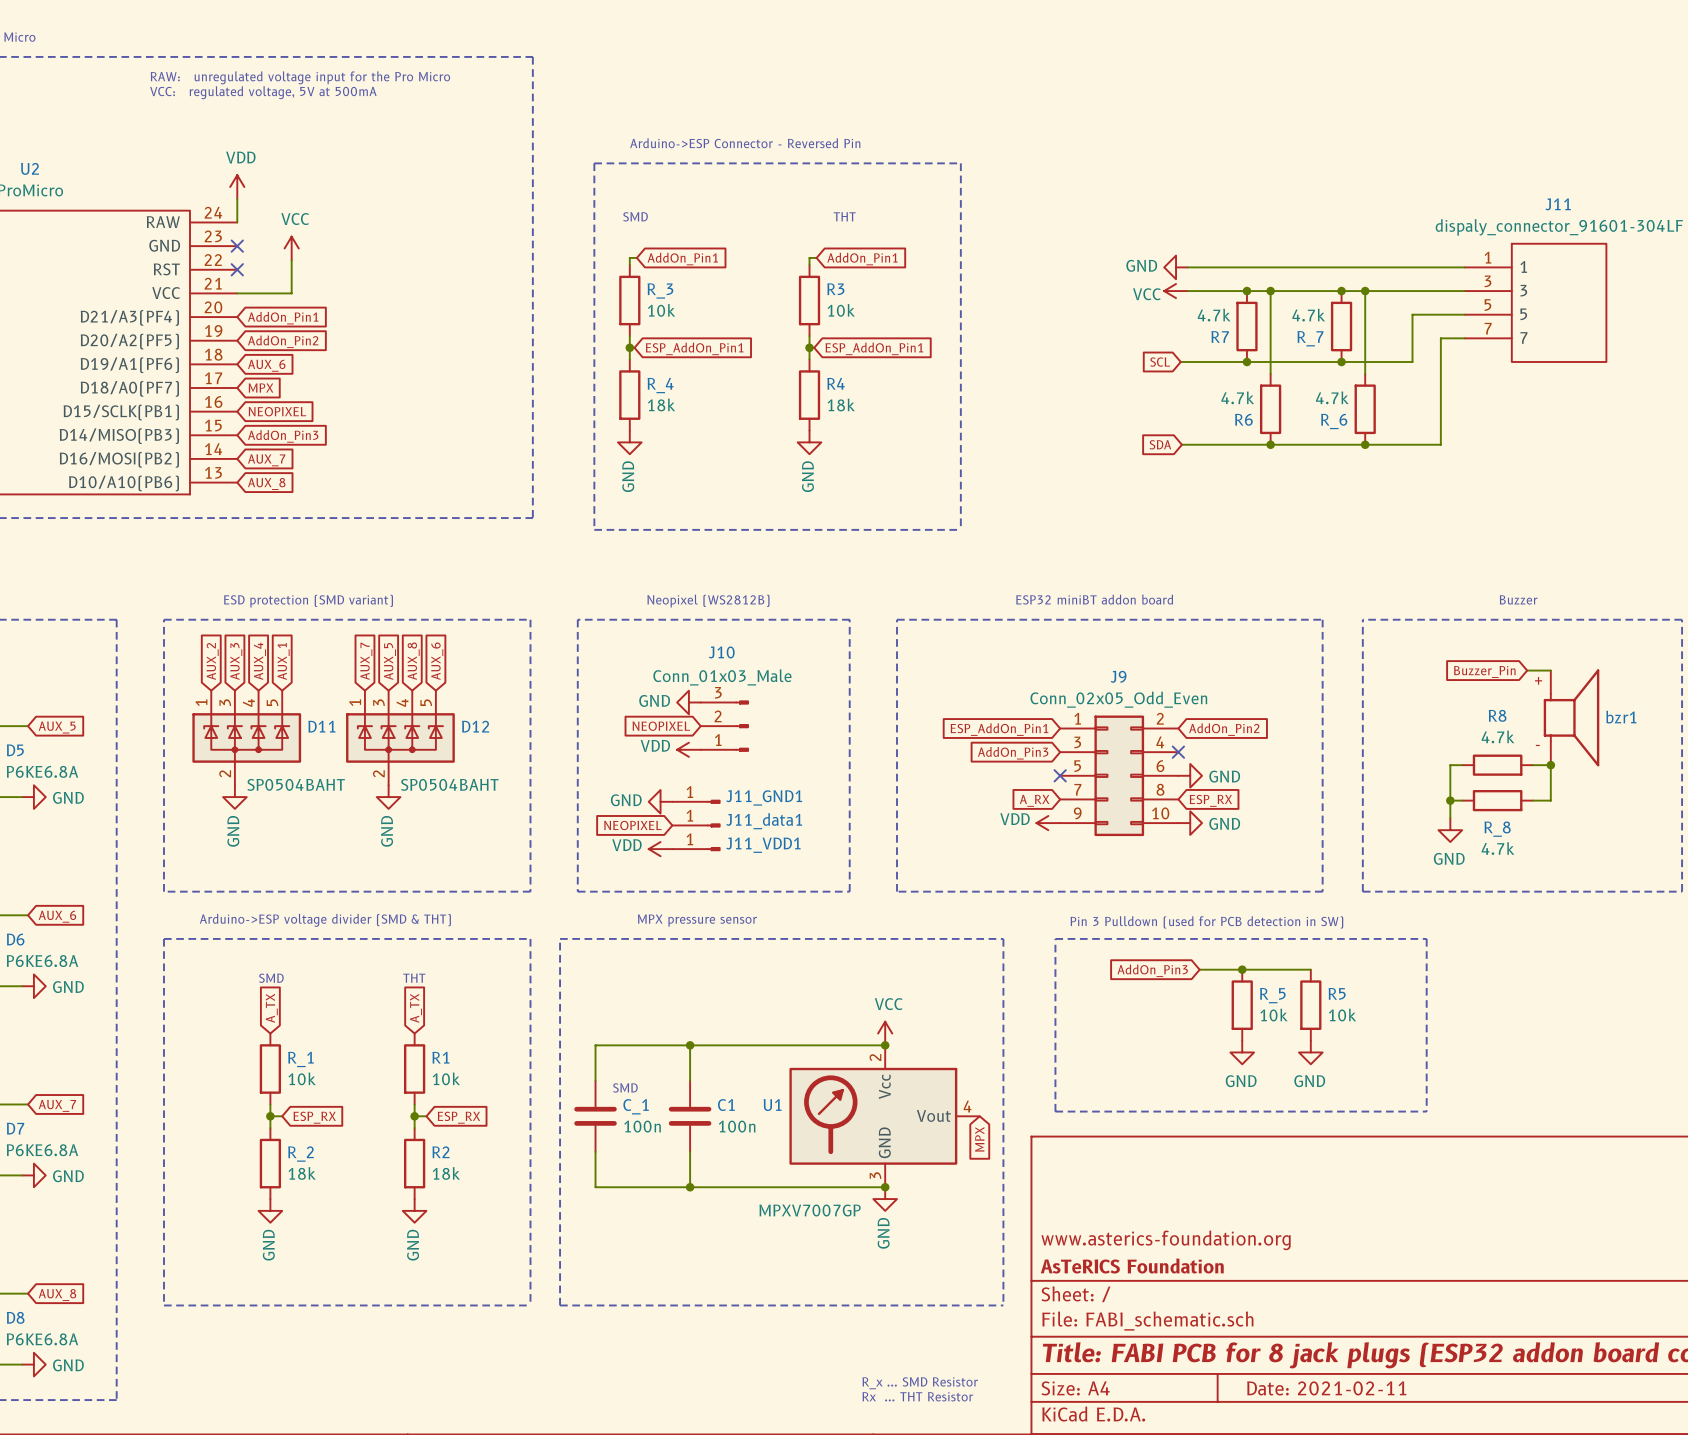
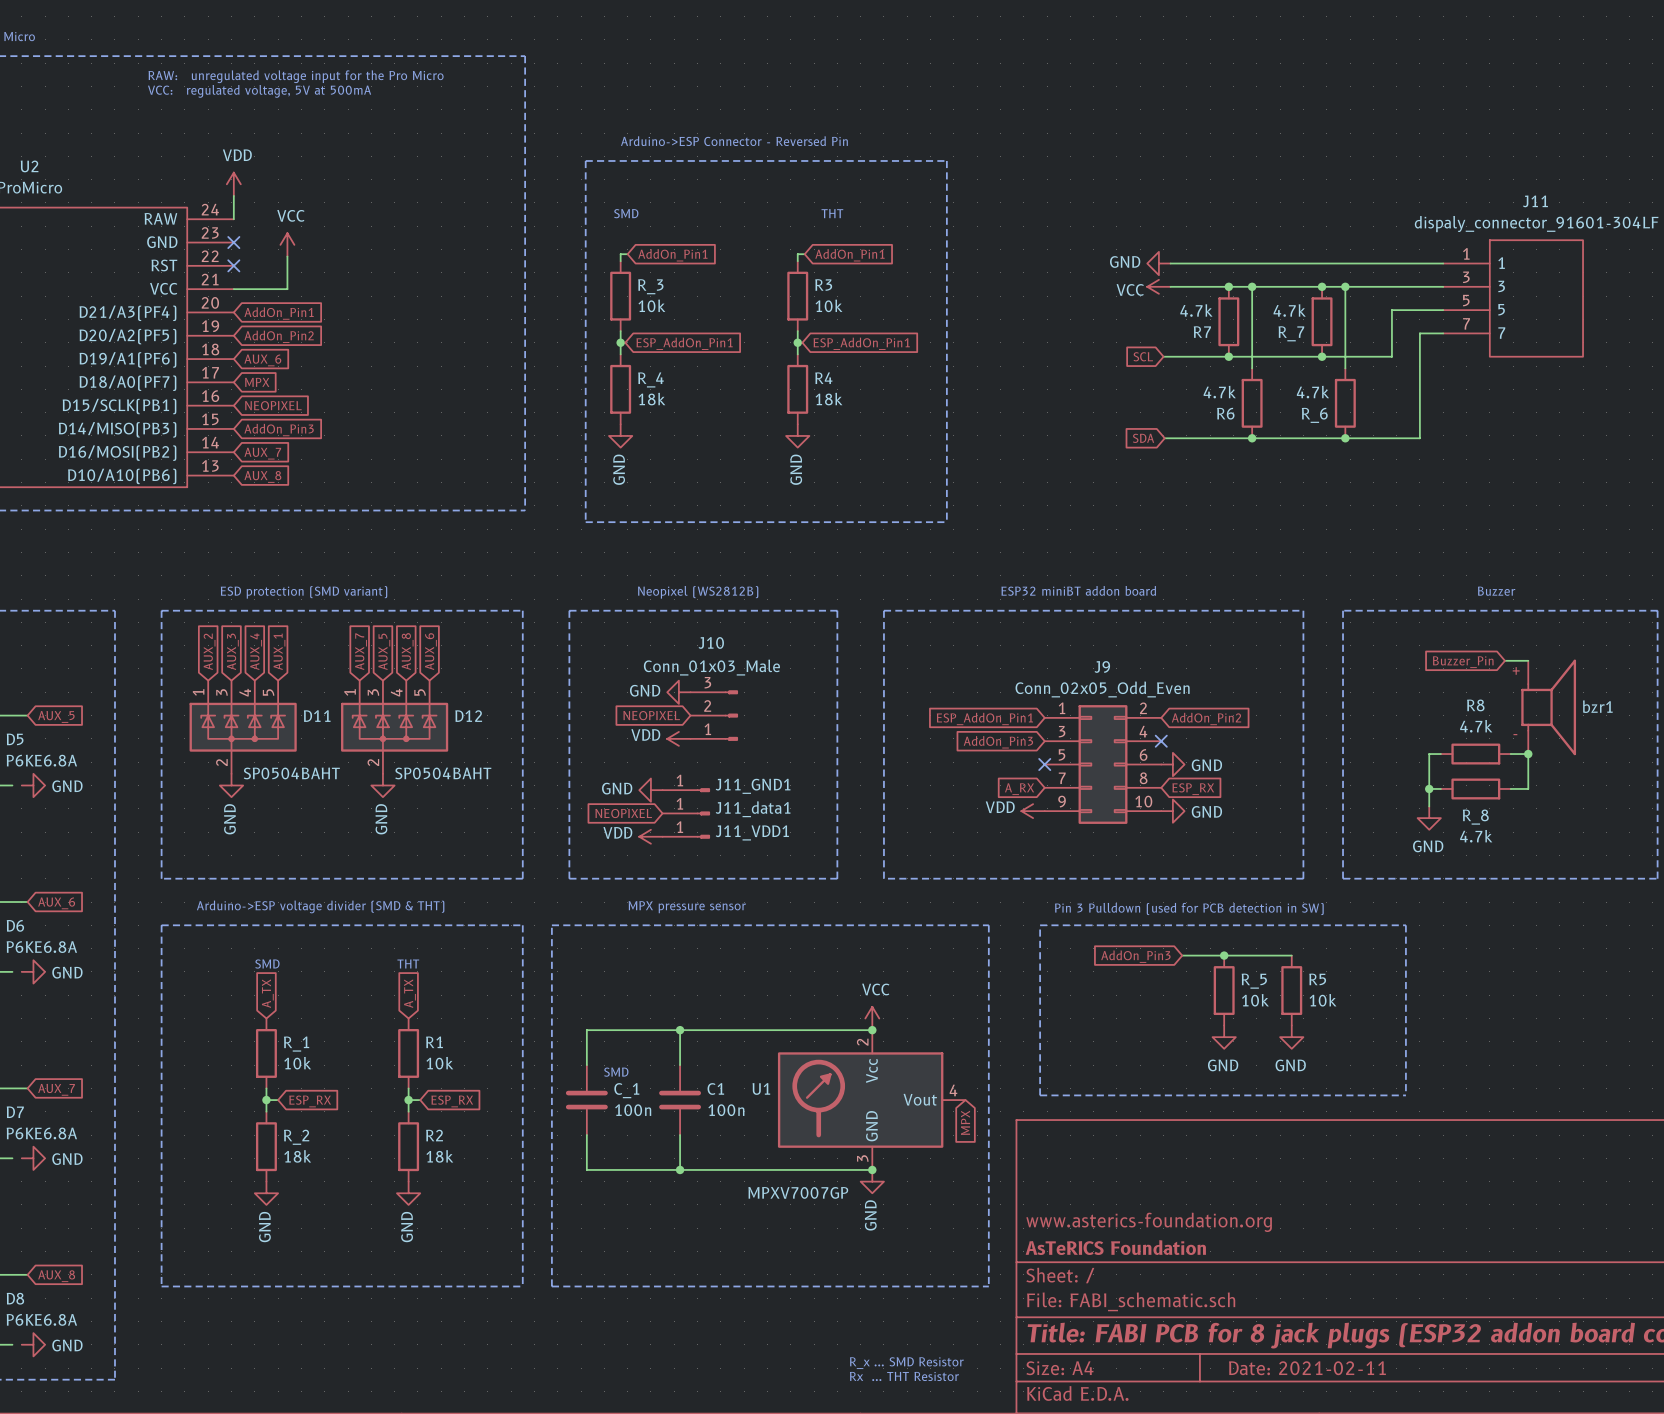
wire: (12, 797) (22, 797) -> none
wire: (12, 986) (22, 986) -> none
wire: (12, 1175) (22, 1175) -> none
wire: (12, 1364) (22, 1364) -> none

